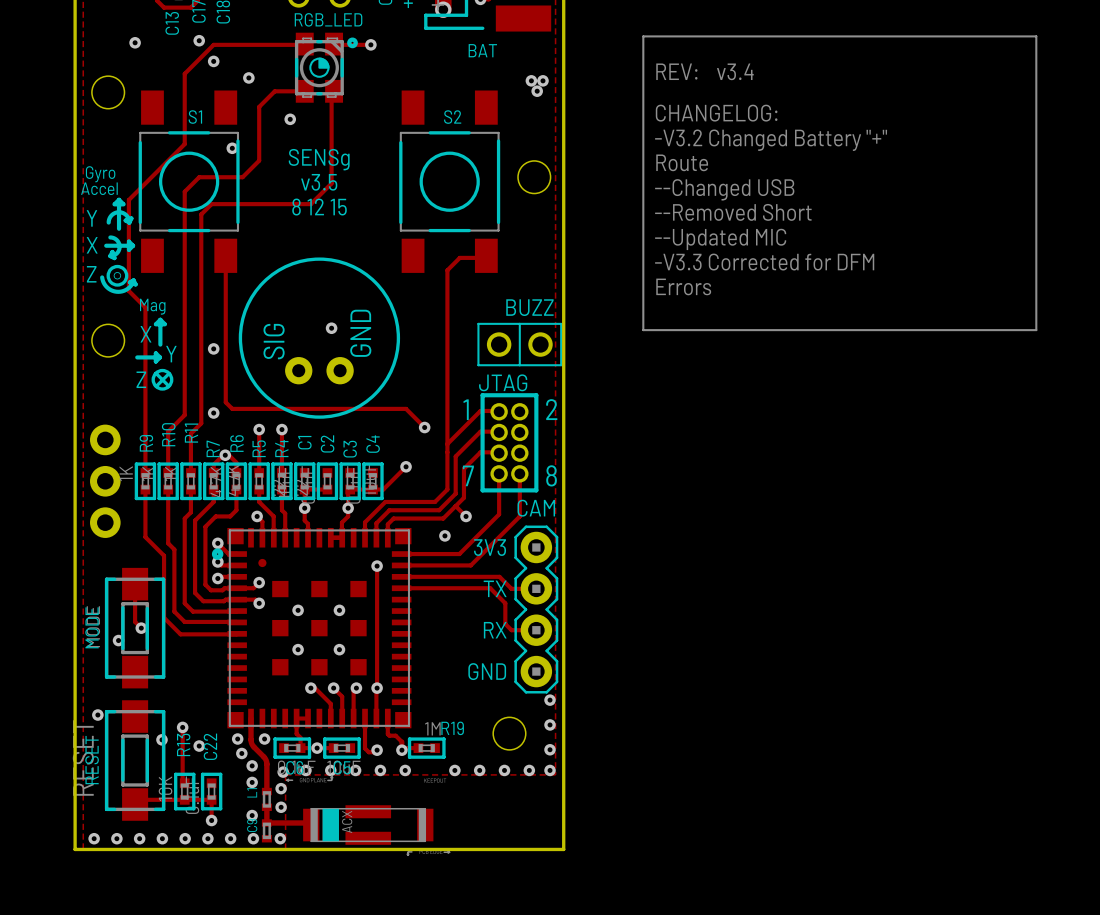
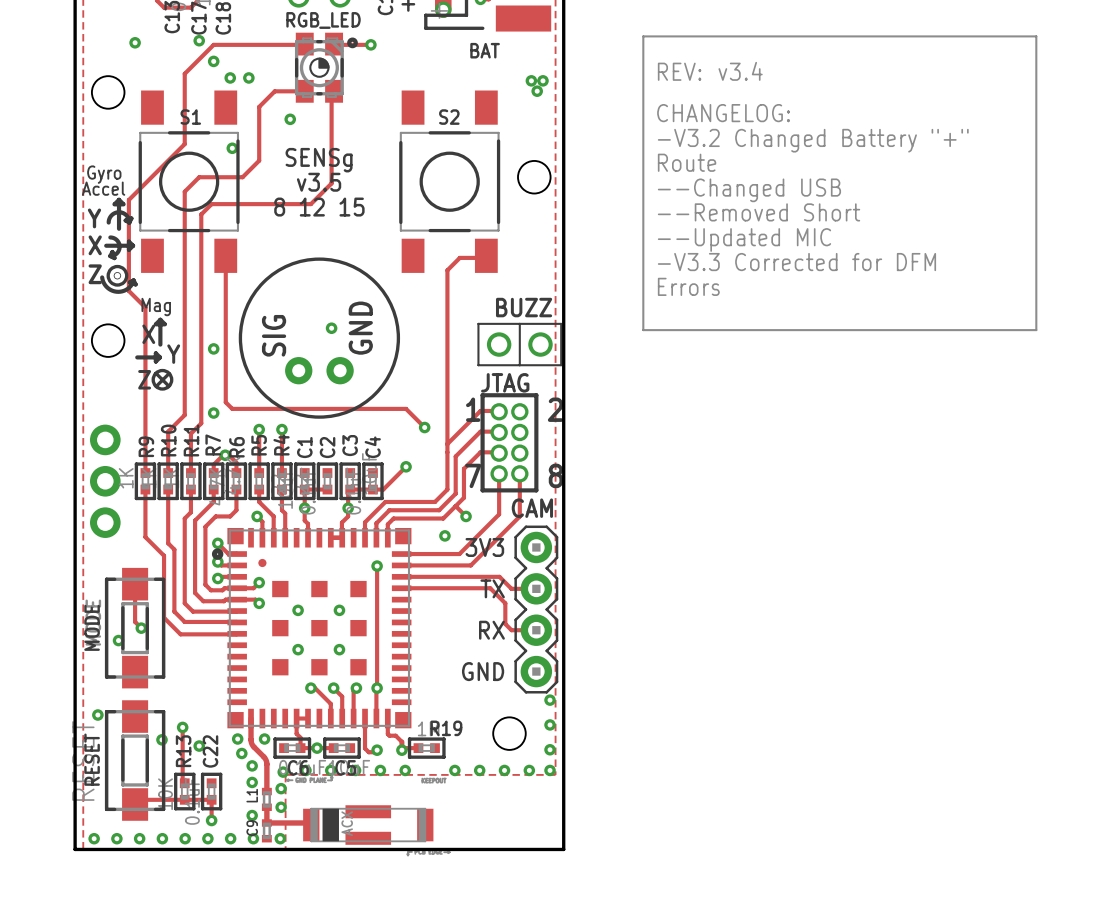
via: none -> (230, 77)

